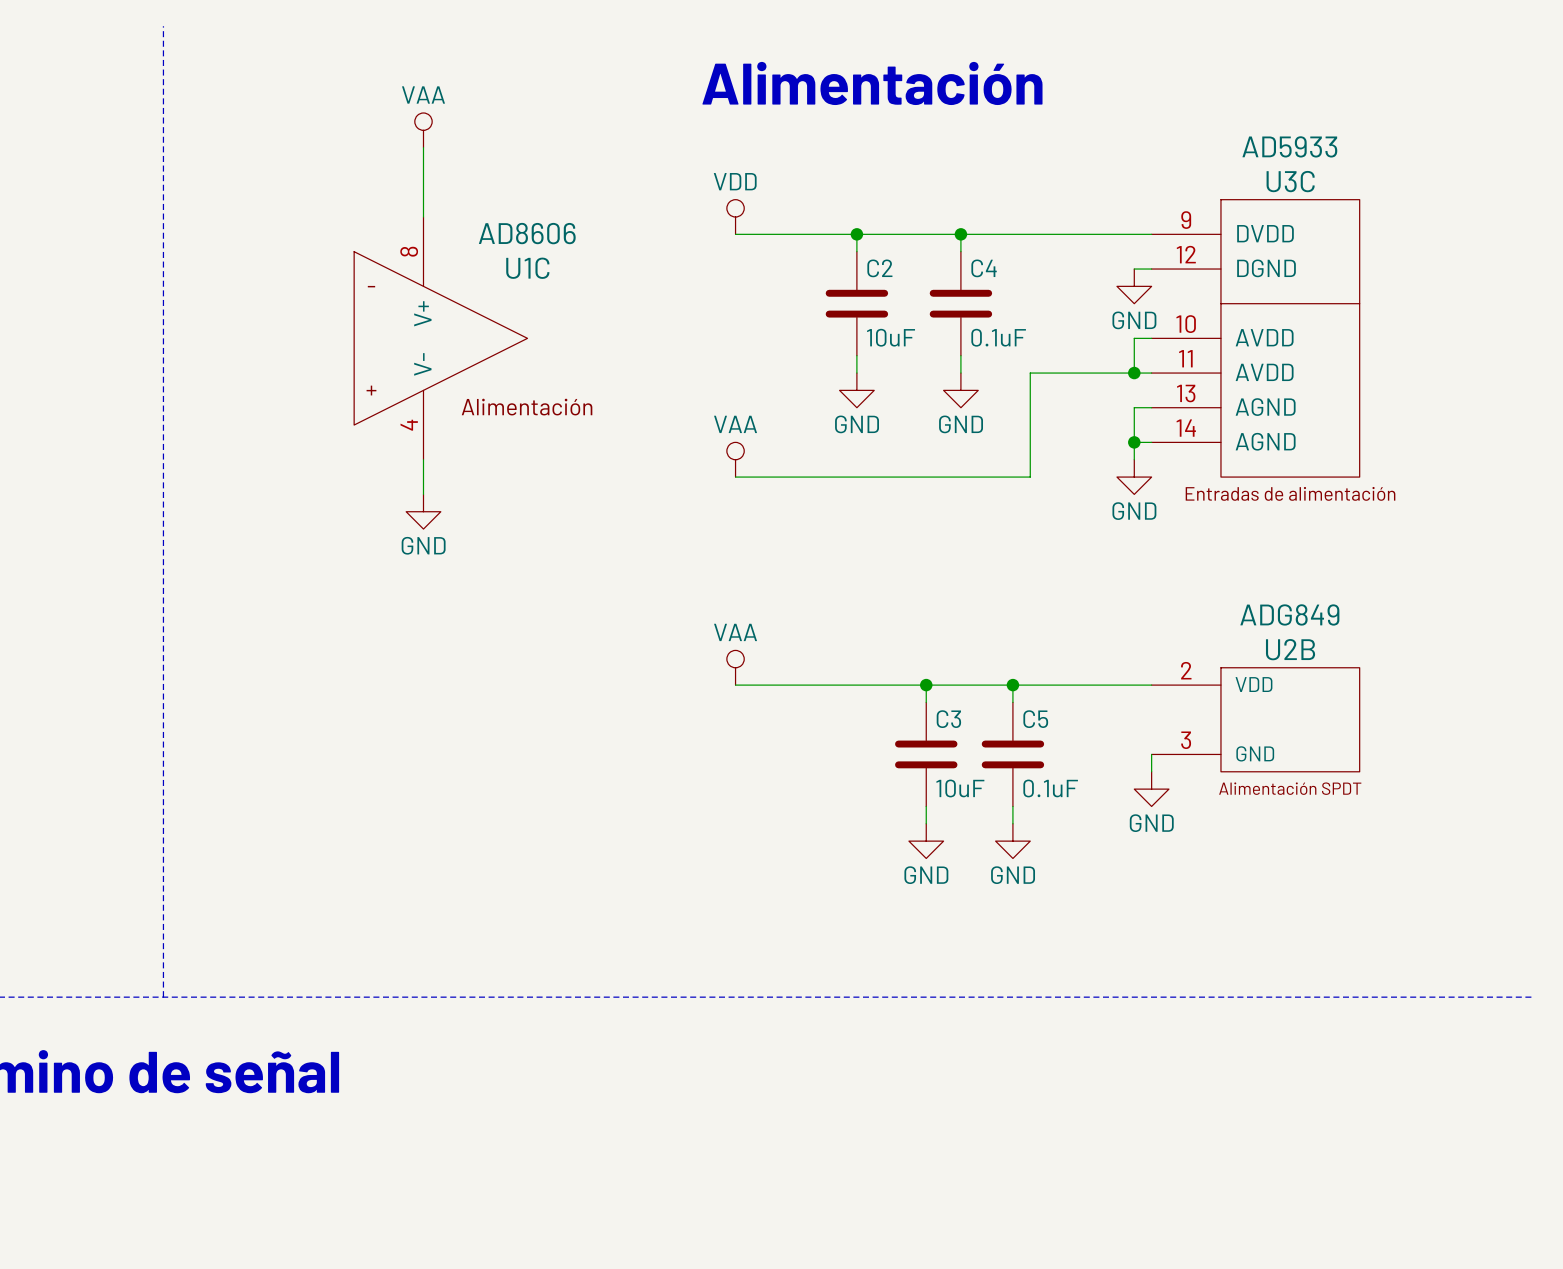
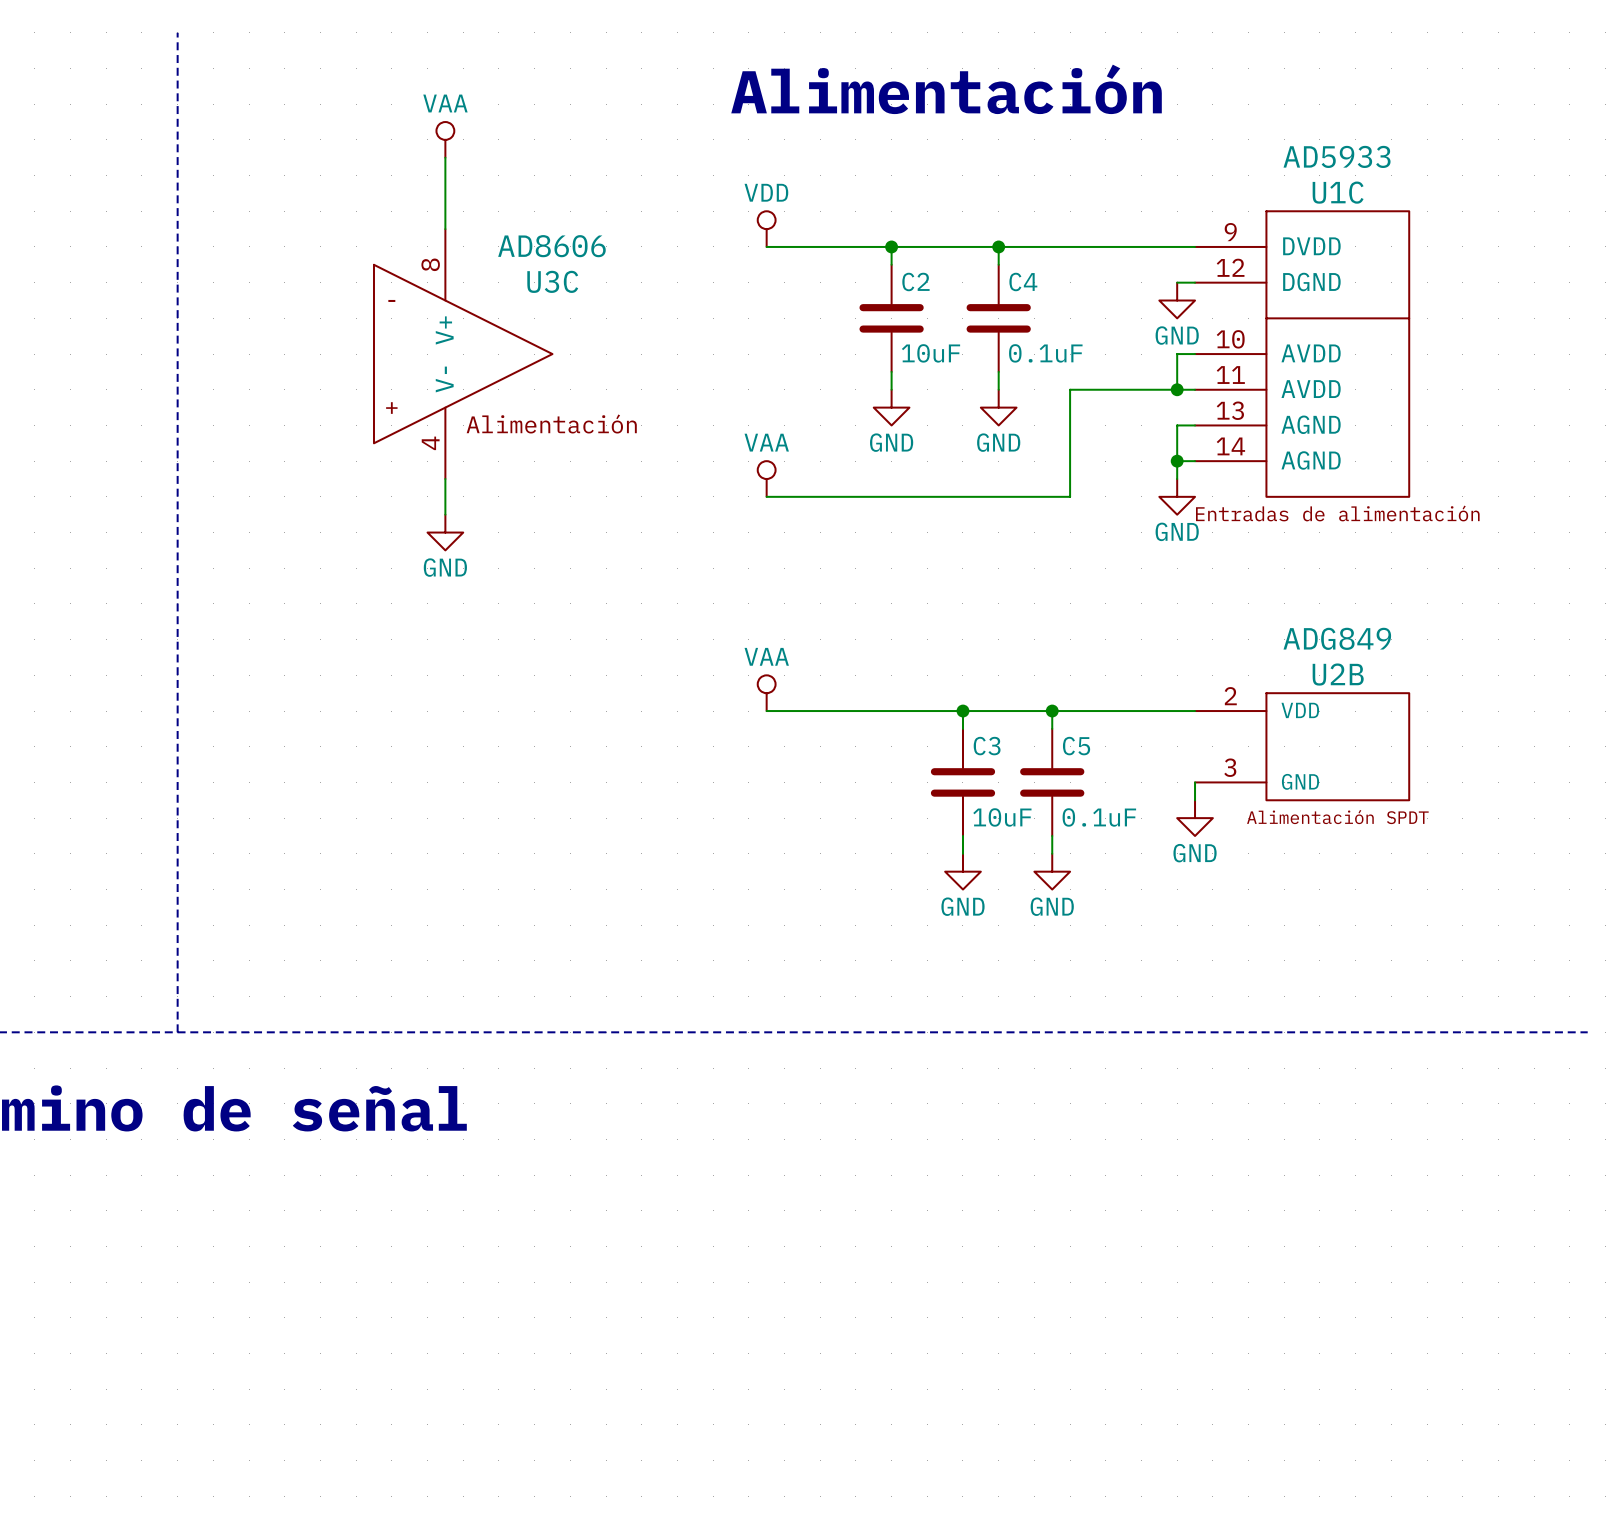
U3C name: U3C (1290, 181) -> U1C (1338, 192)
U1C name: U1C (527, 268) -> U3C (552, 281)

